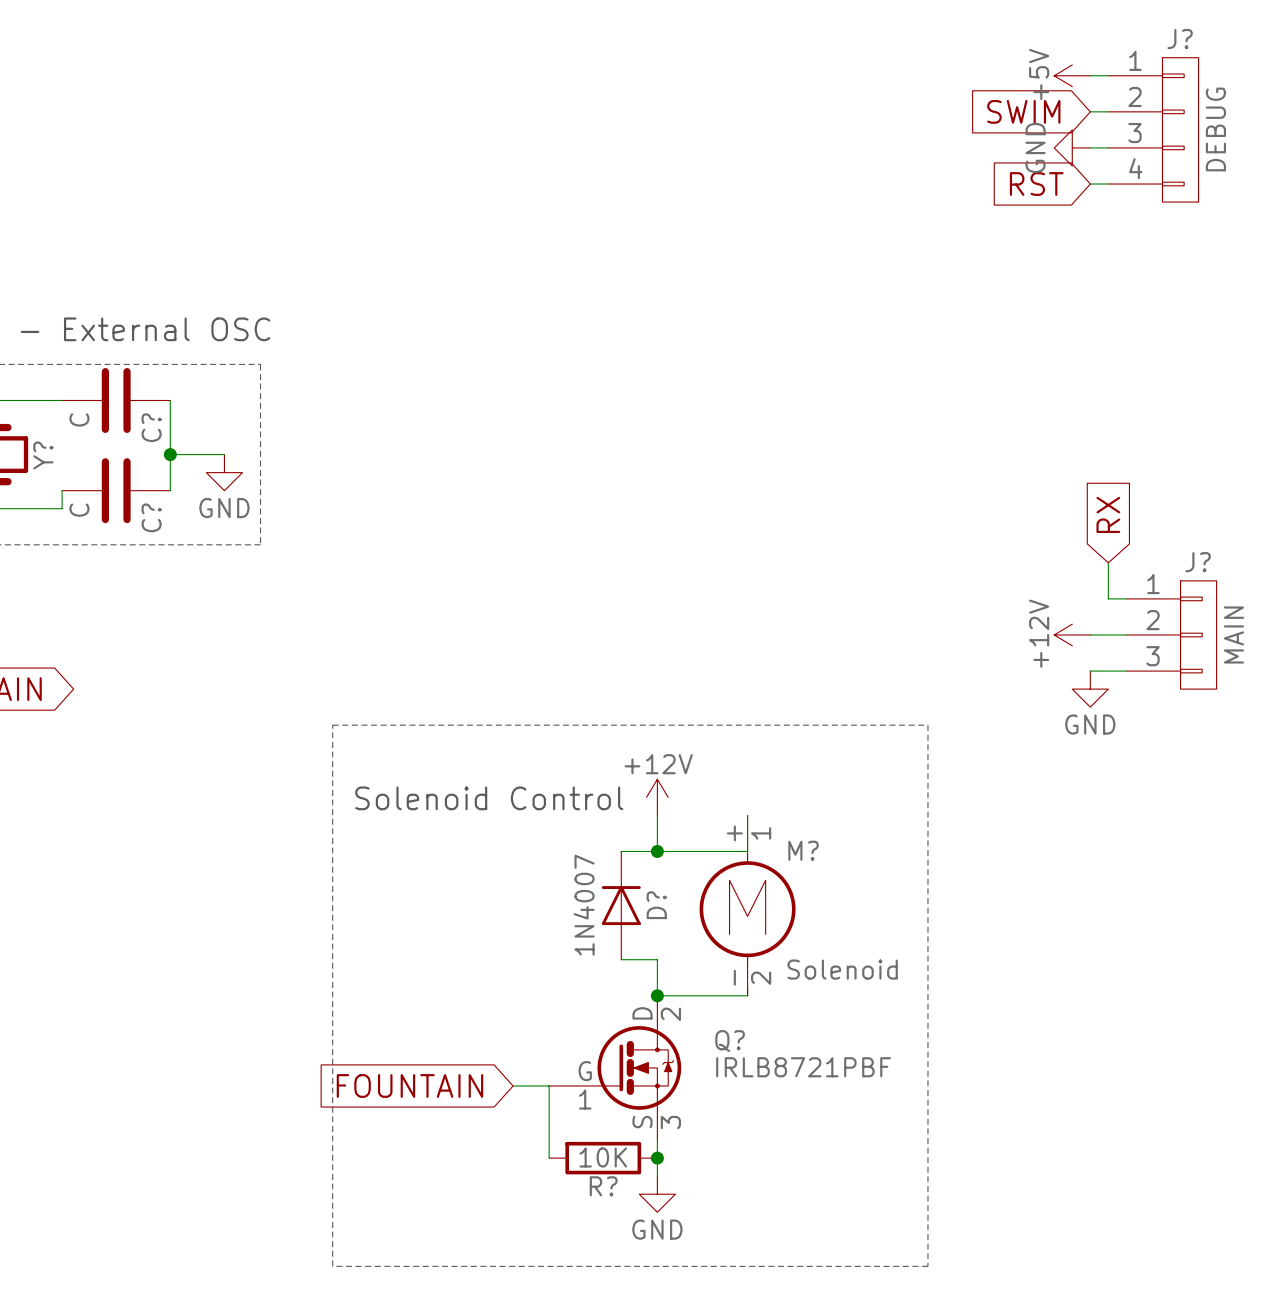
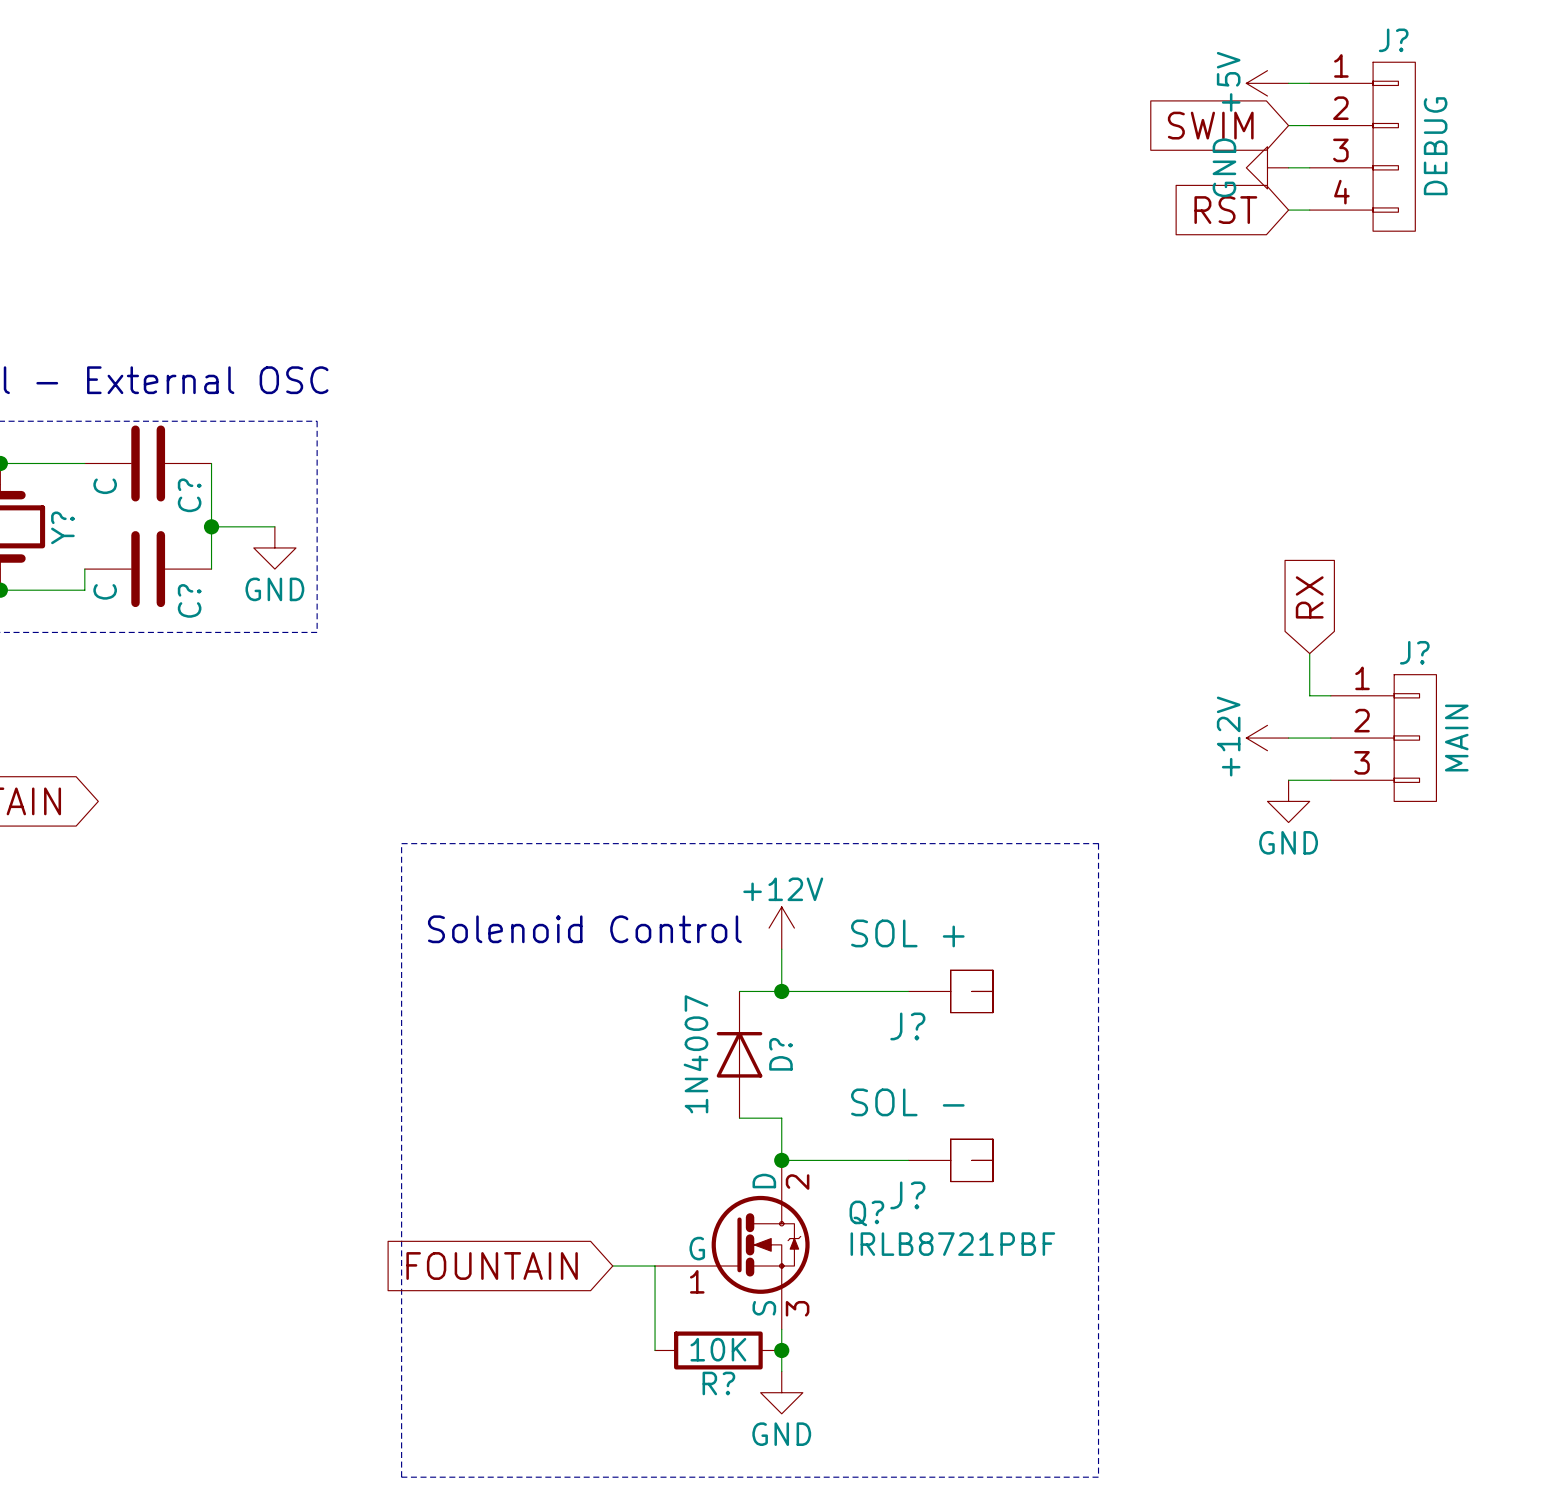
wire: (747, 815) (747, 851) -> (908, 991) (887, 991)
J?: none -> SOL + (950, 991)
M?: Solenoid (747, 905) -> none
wire: none -> (887, 1160) (908, 1160)
J?: none -> SOL - (950, 1160)

